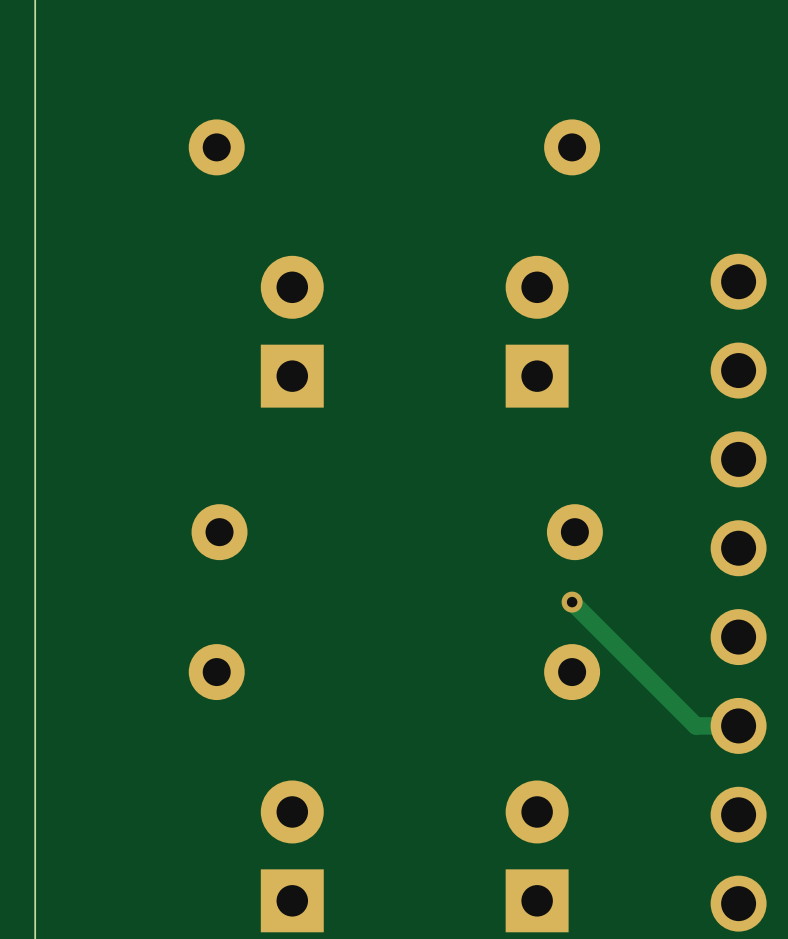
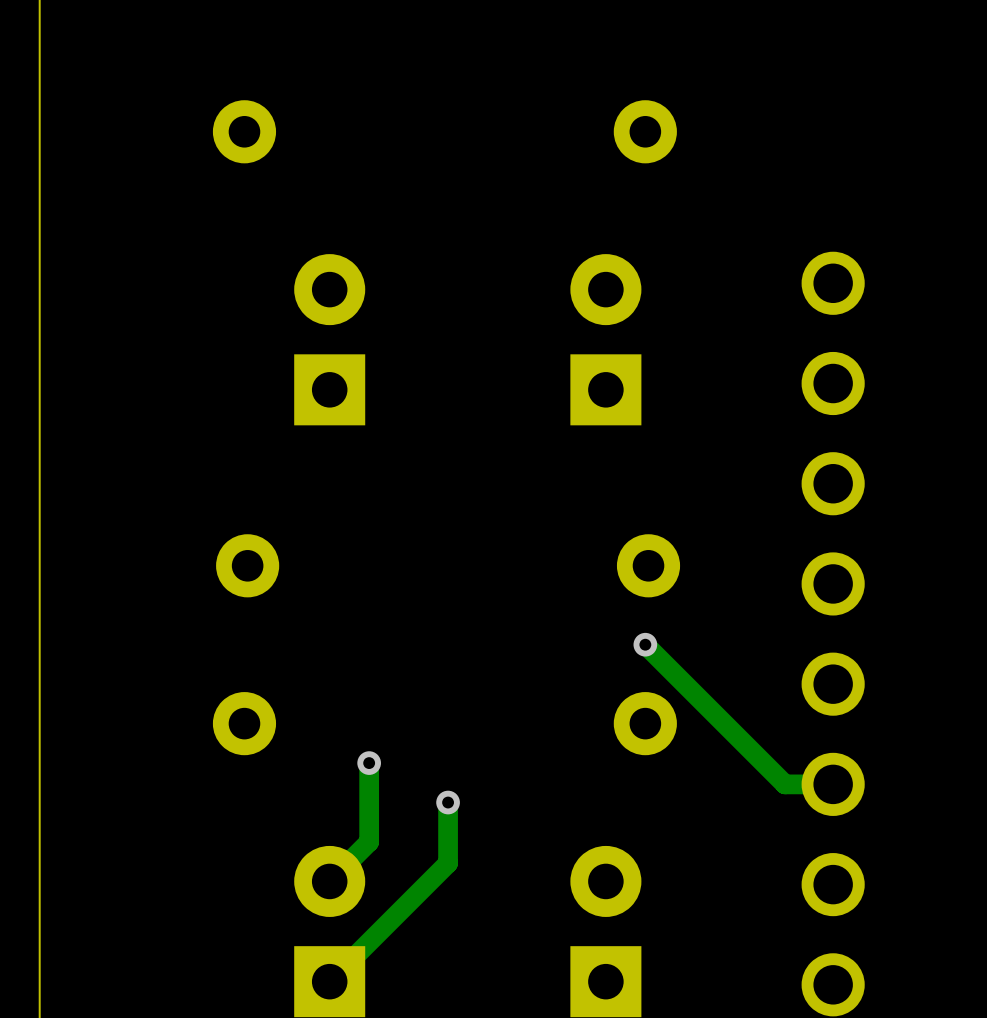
track: none -> (369, 763) (369, 841) (329, 881)
via: none -> (369, 763)
track: none -> (448, 802) (448, 863) (329, 981)
via: none -> (448, 802)

